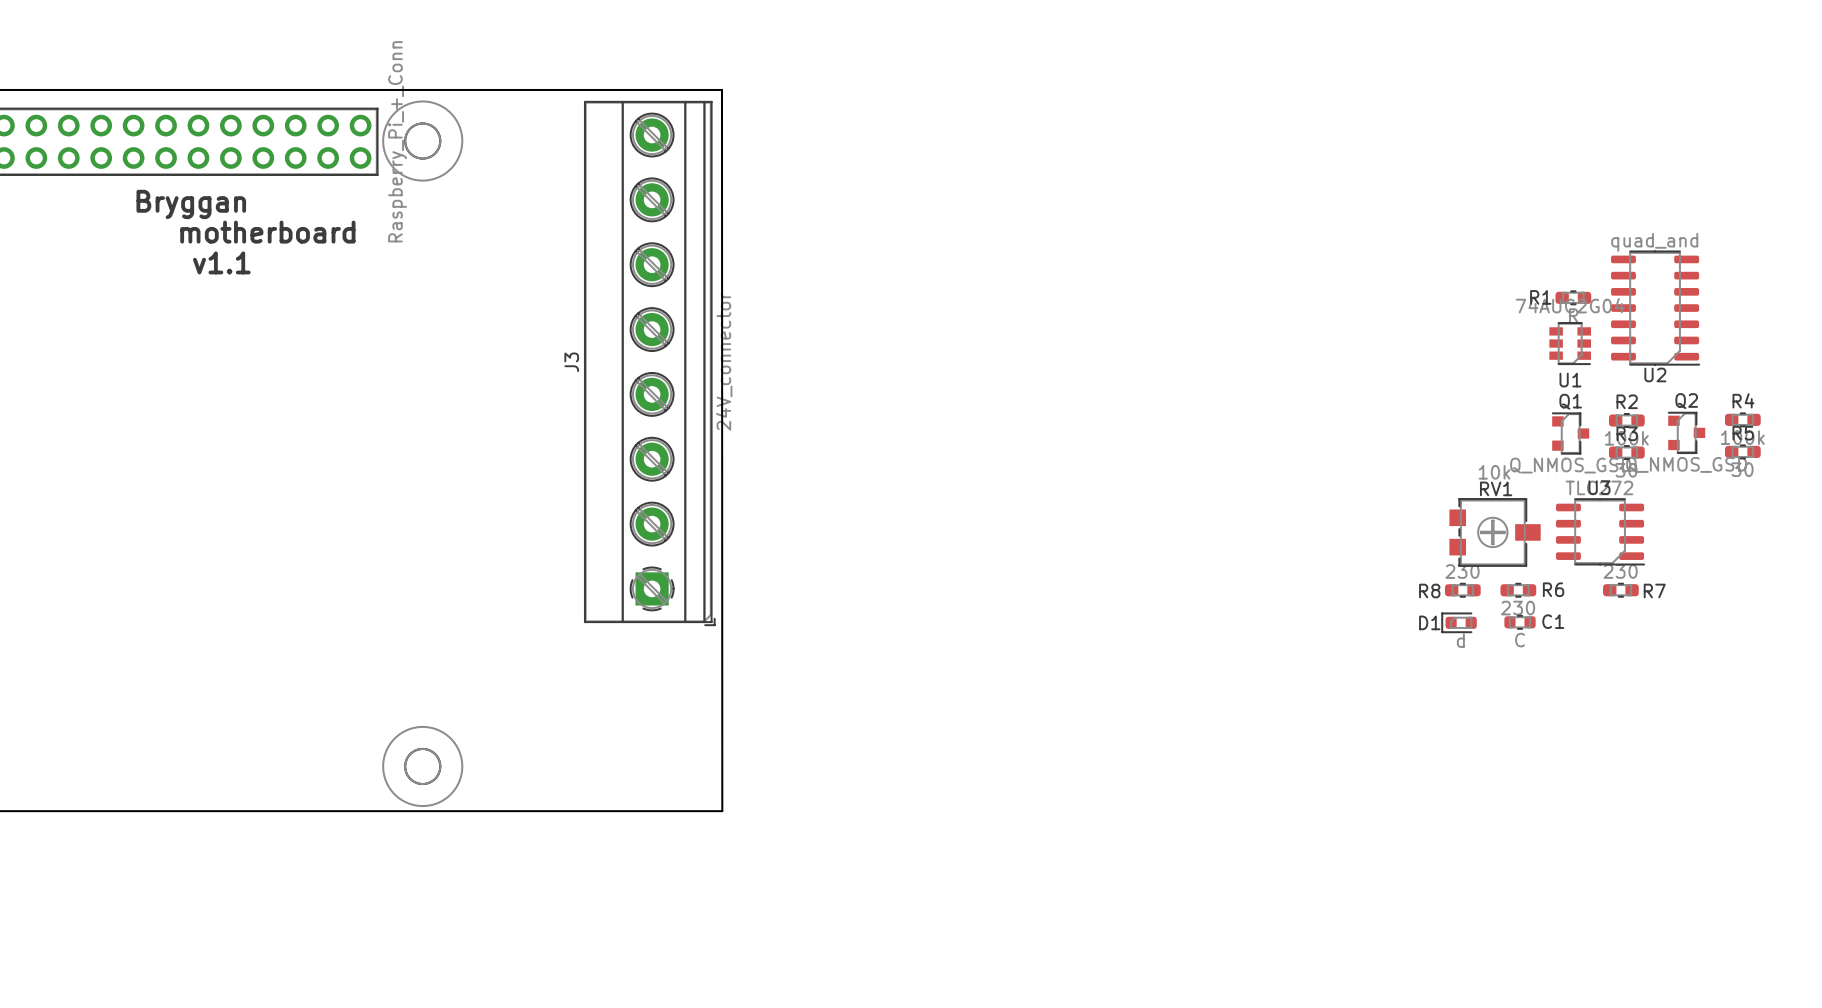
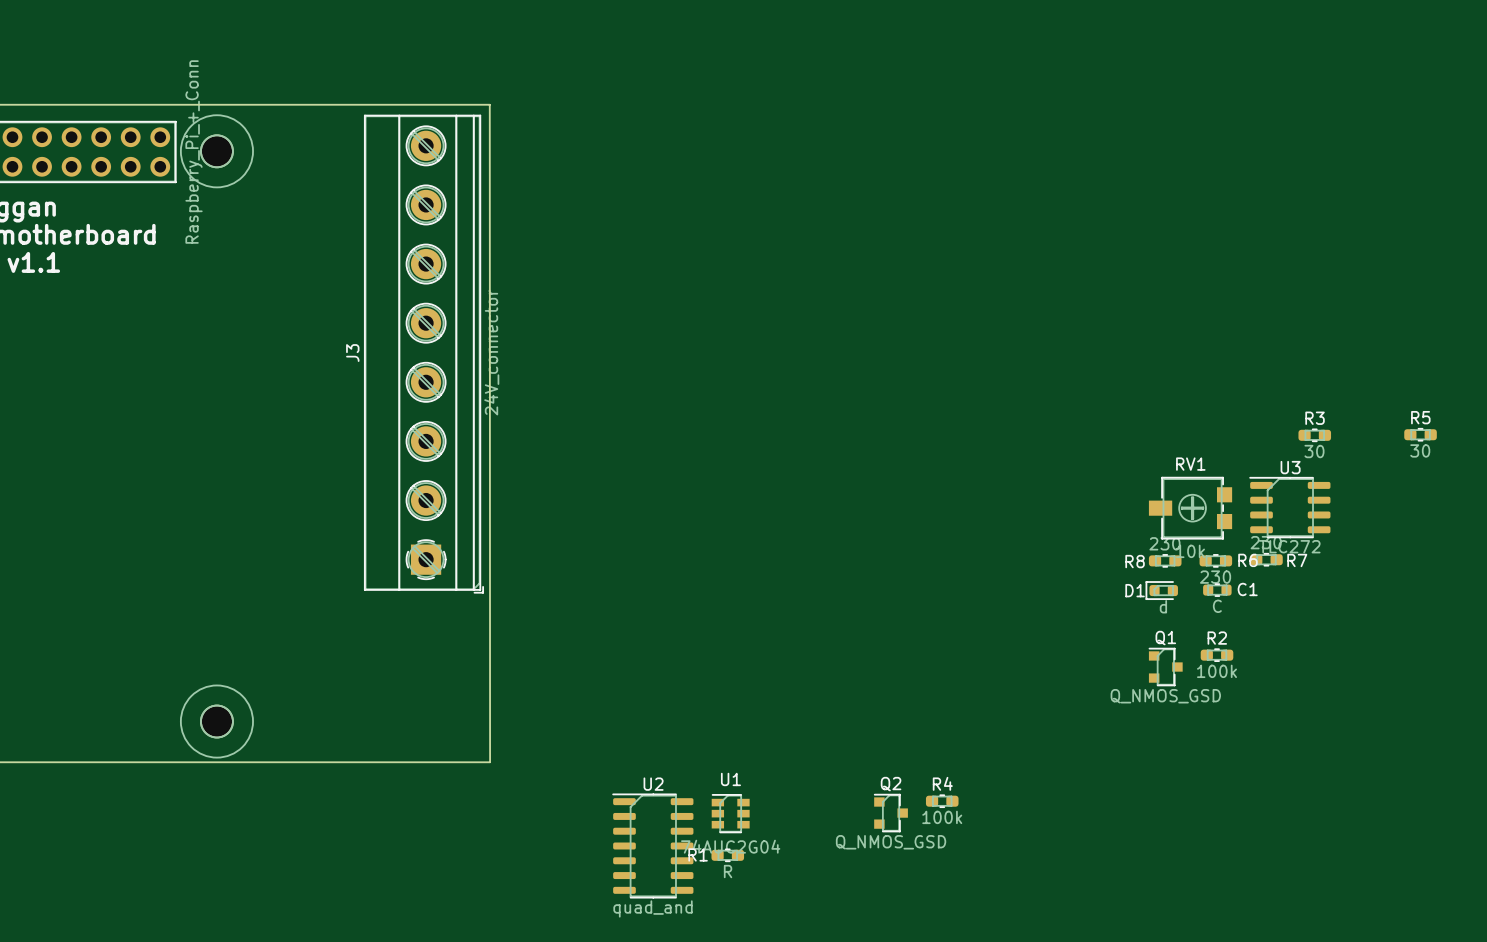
R1 position: (1573, 297) -> (727, 855)
U2 rotation: 0° (1655, 308) -> 180° (652, 846)
U2 position: (1655, 308) -> (652, 846)
U1 rotation: 0° (1570, 343) -> 180° (730, 813)
U1 position: (1570, 343) -> (730, 813)
R4 position: (1742, 419) -> (942, 801)
R2 position: (1626, 420) -> (1217, 655)
Q2 position: (1686, 432) -> (890, 813)
Q1 position: (1570, 433) -> (1165, 667)
U3 rotation: 0° (1600, 531) -> 180° (1289, 507)
RV1 rotation: 0° (1495, 532) -> 180° (1190, 508)
R7 position: (1620, 590) -> (1266, 559)

